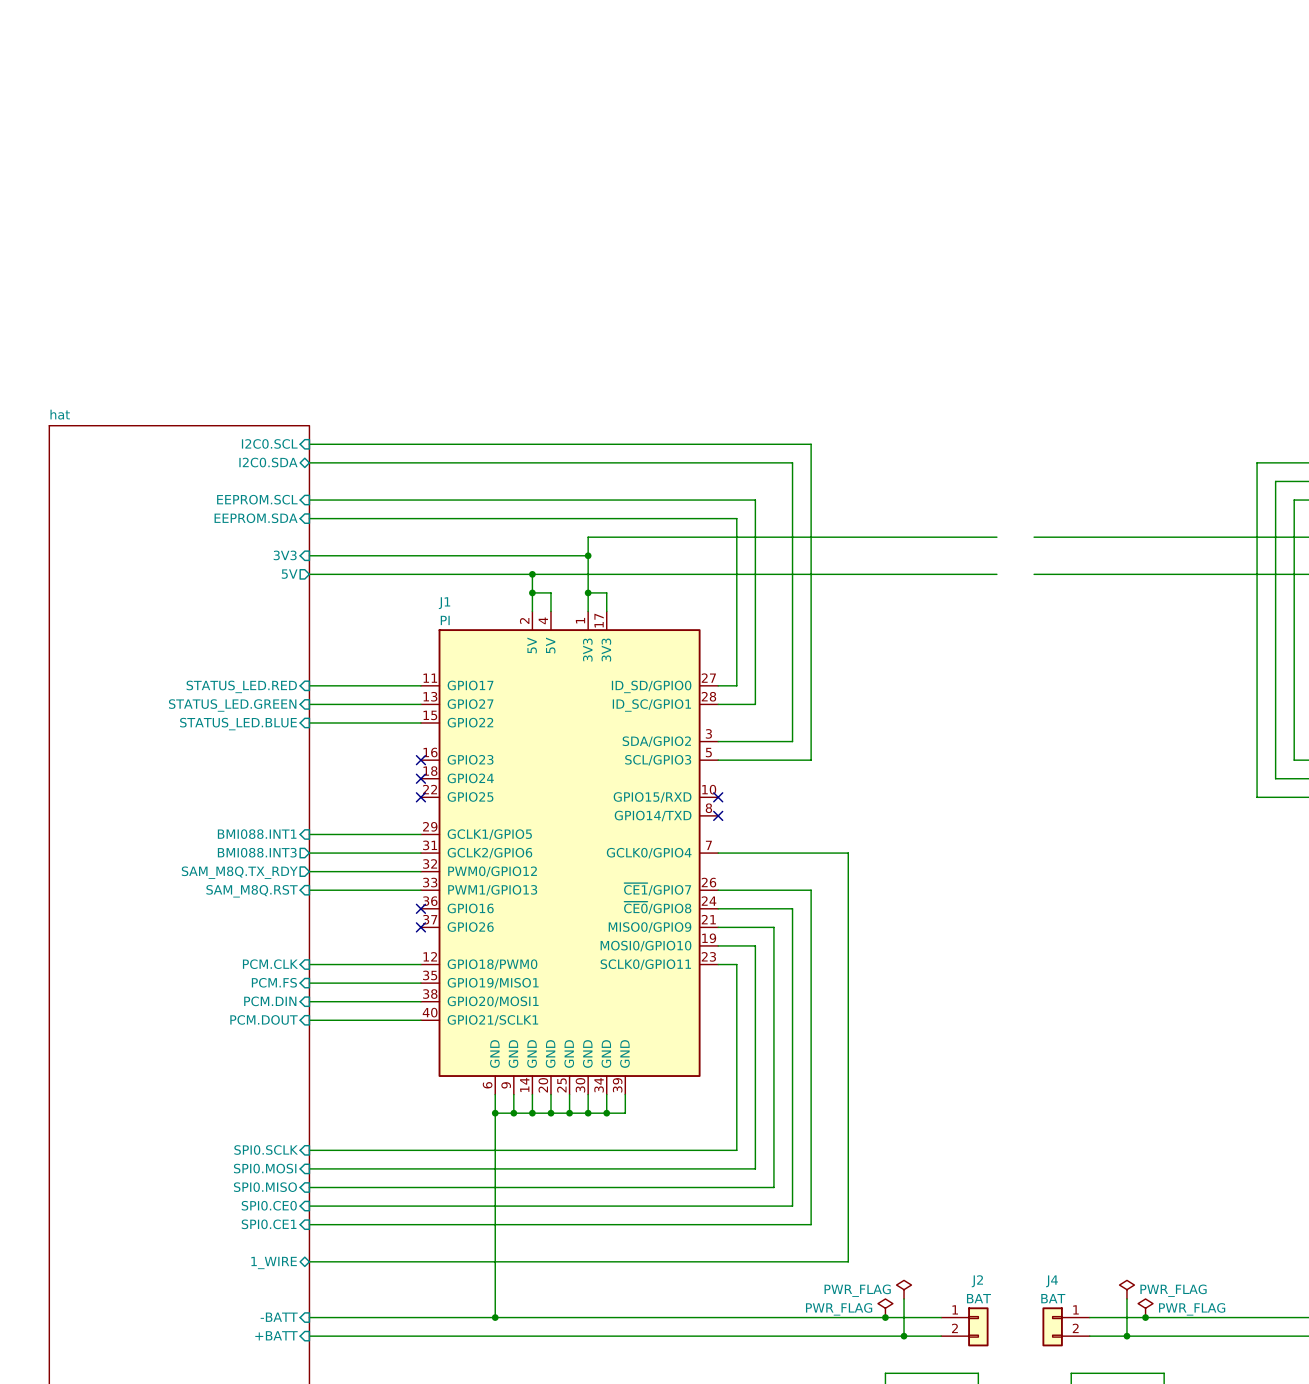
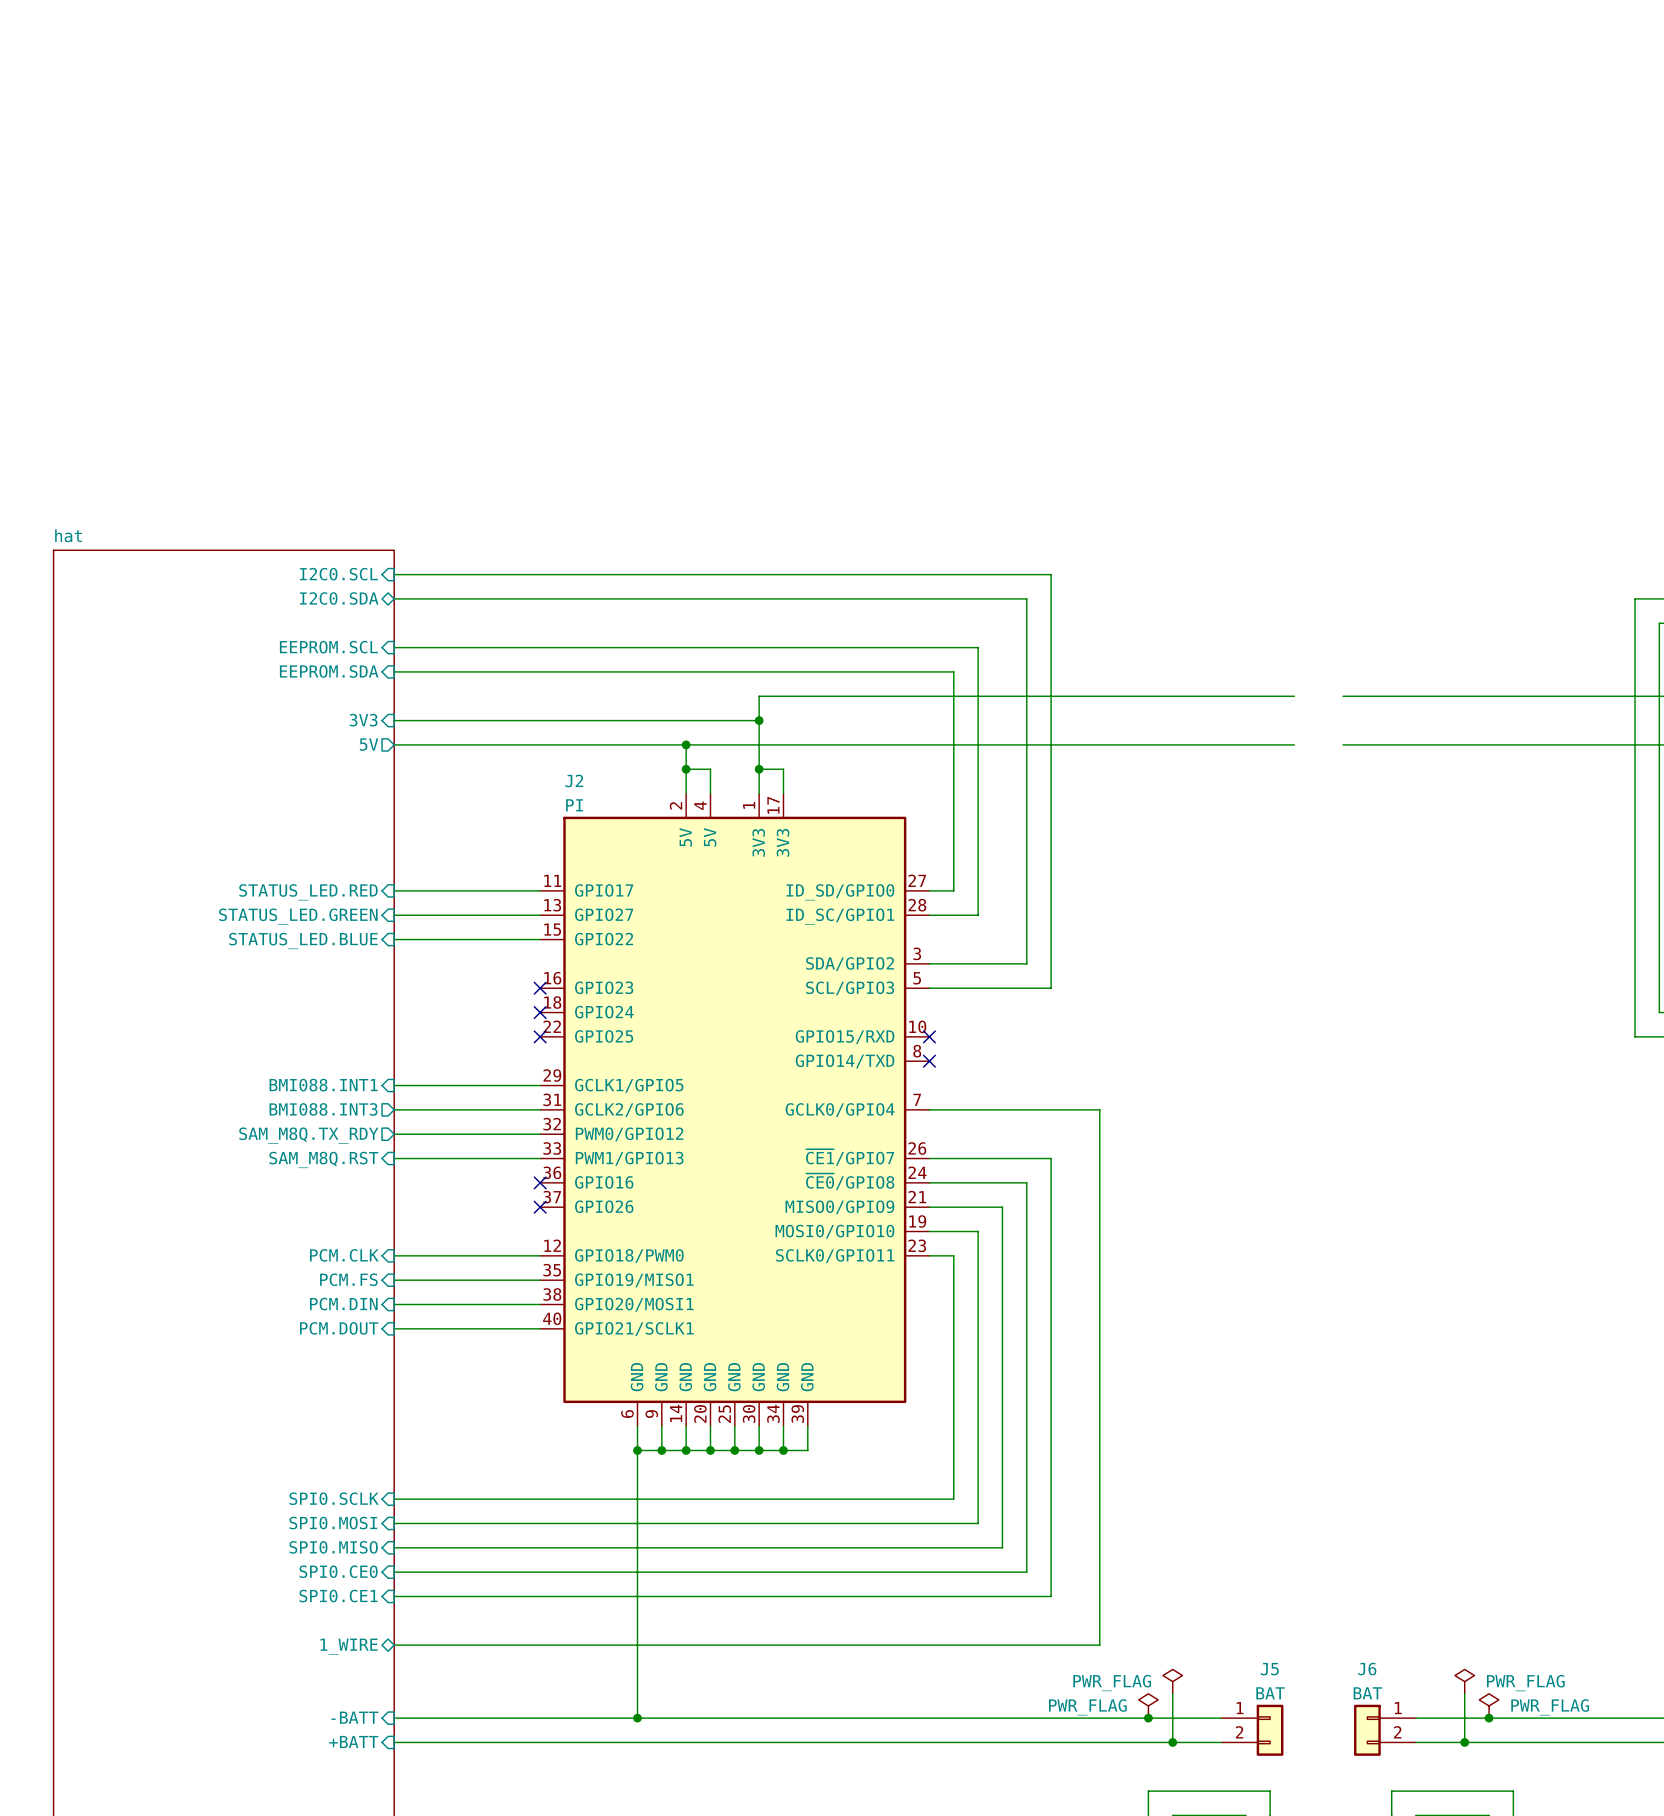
J1 name: J1 (444, 603) -> J2 (574, 780)
J2 name: J2 (977, 1281) -> J5 (1269, 1669)
J4 name: J4 (1051, 1281) -> J6 (1367, 1669)

